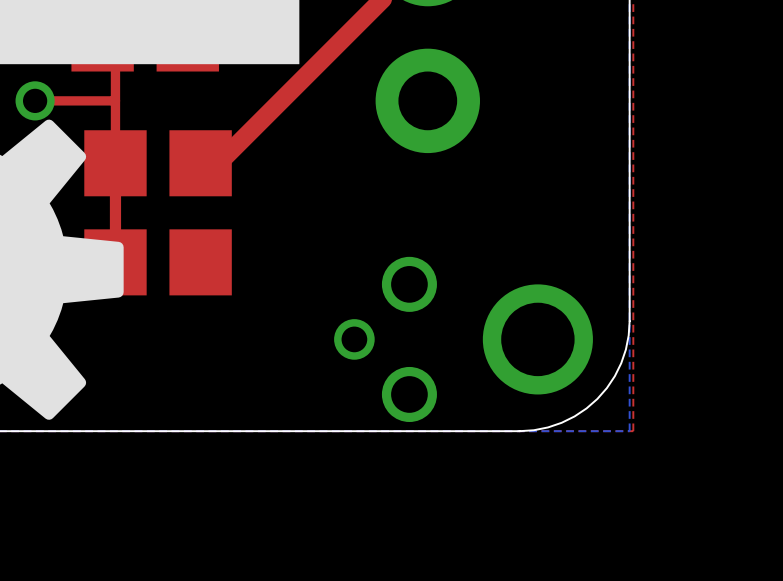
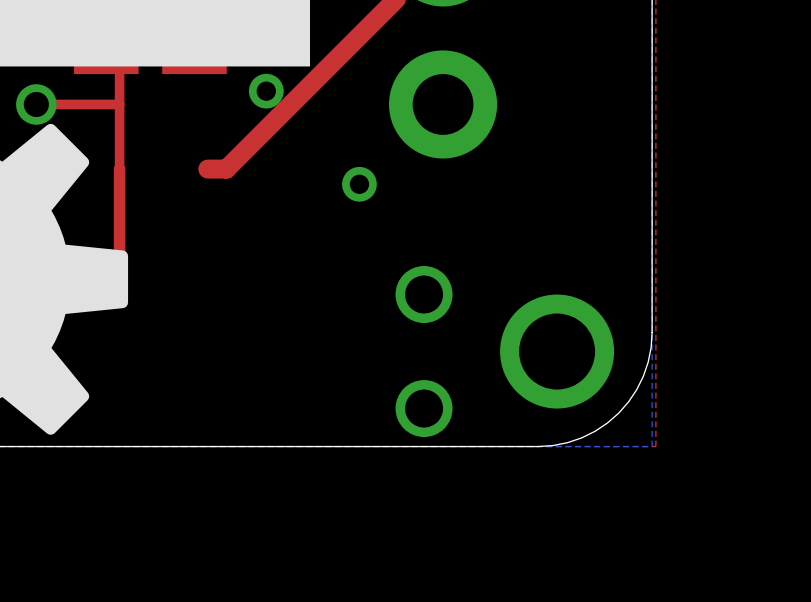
via: none -> (266, 91)
part: (158, 163) -> none
via: none -> (359, 184)
part: (158, 262) -> none
via: (354, 339) -> none

